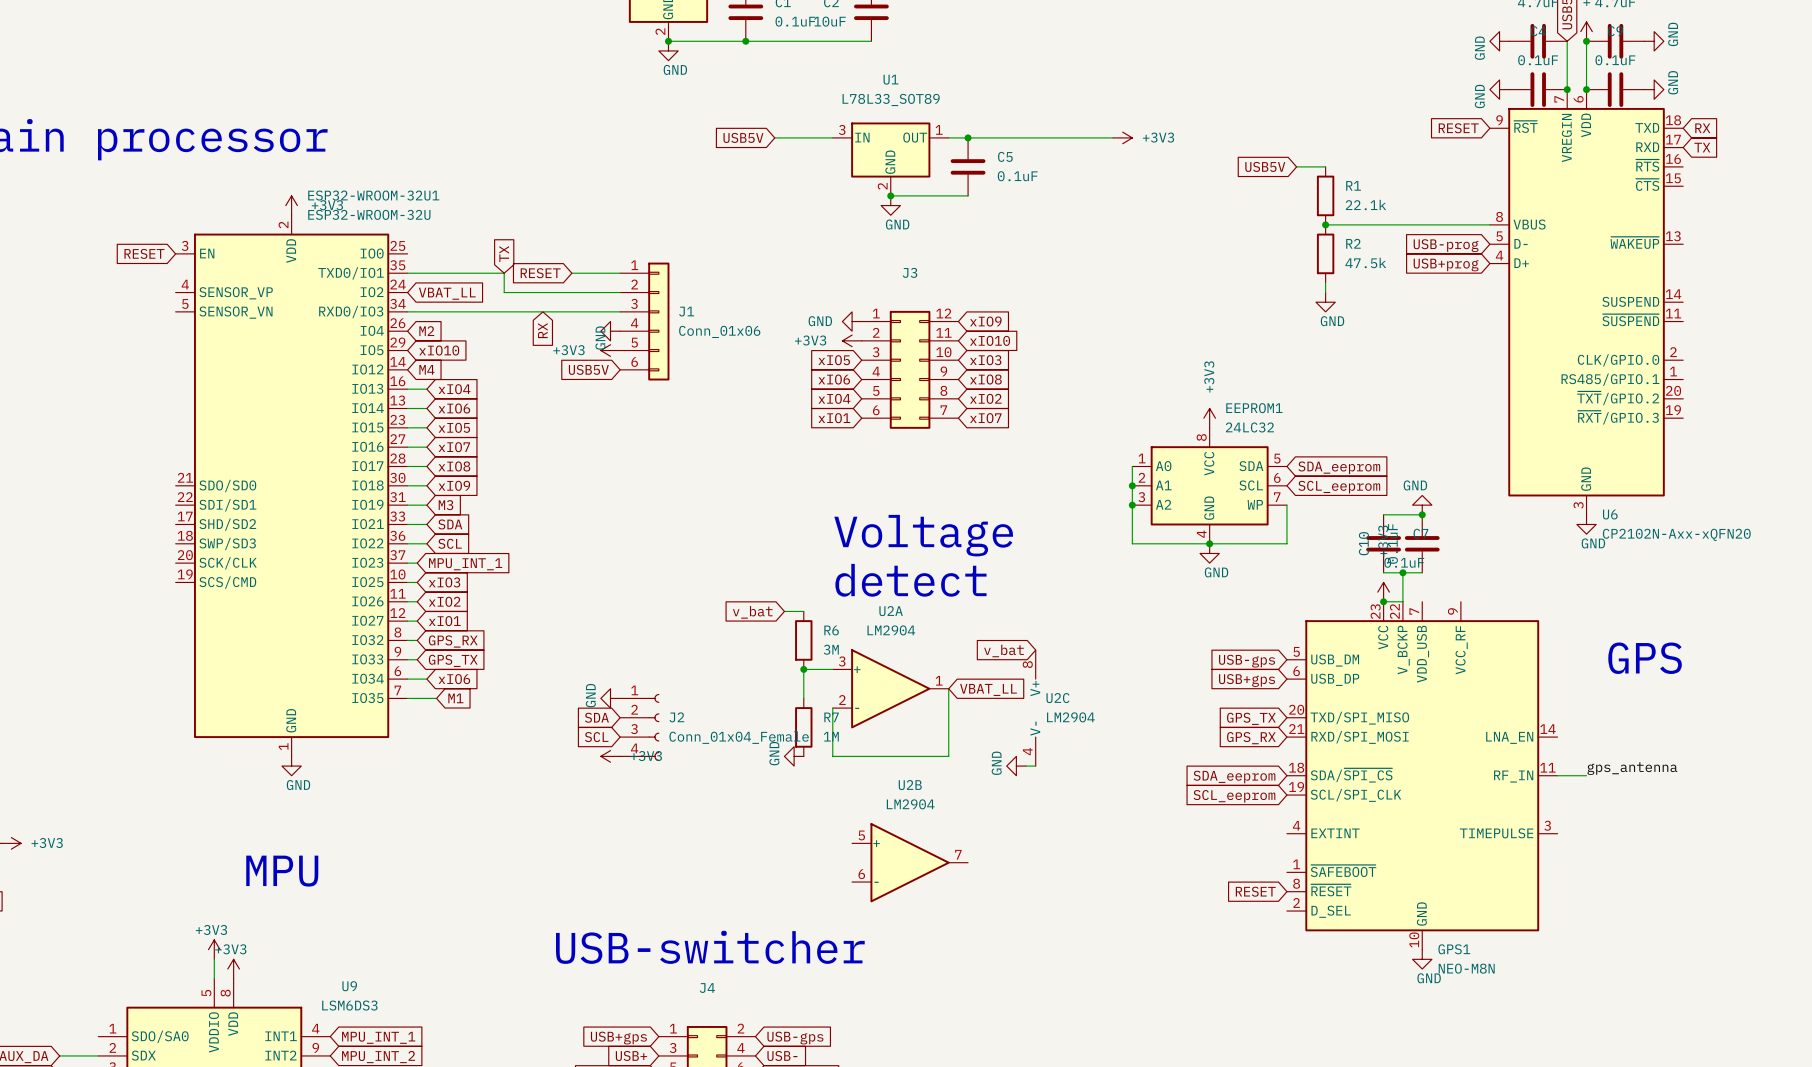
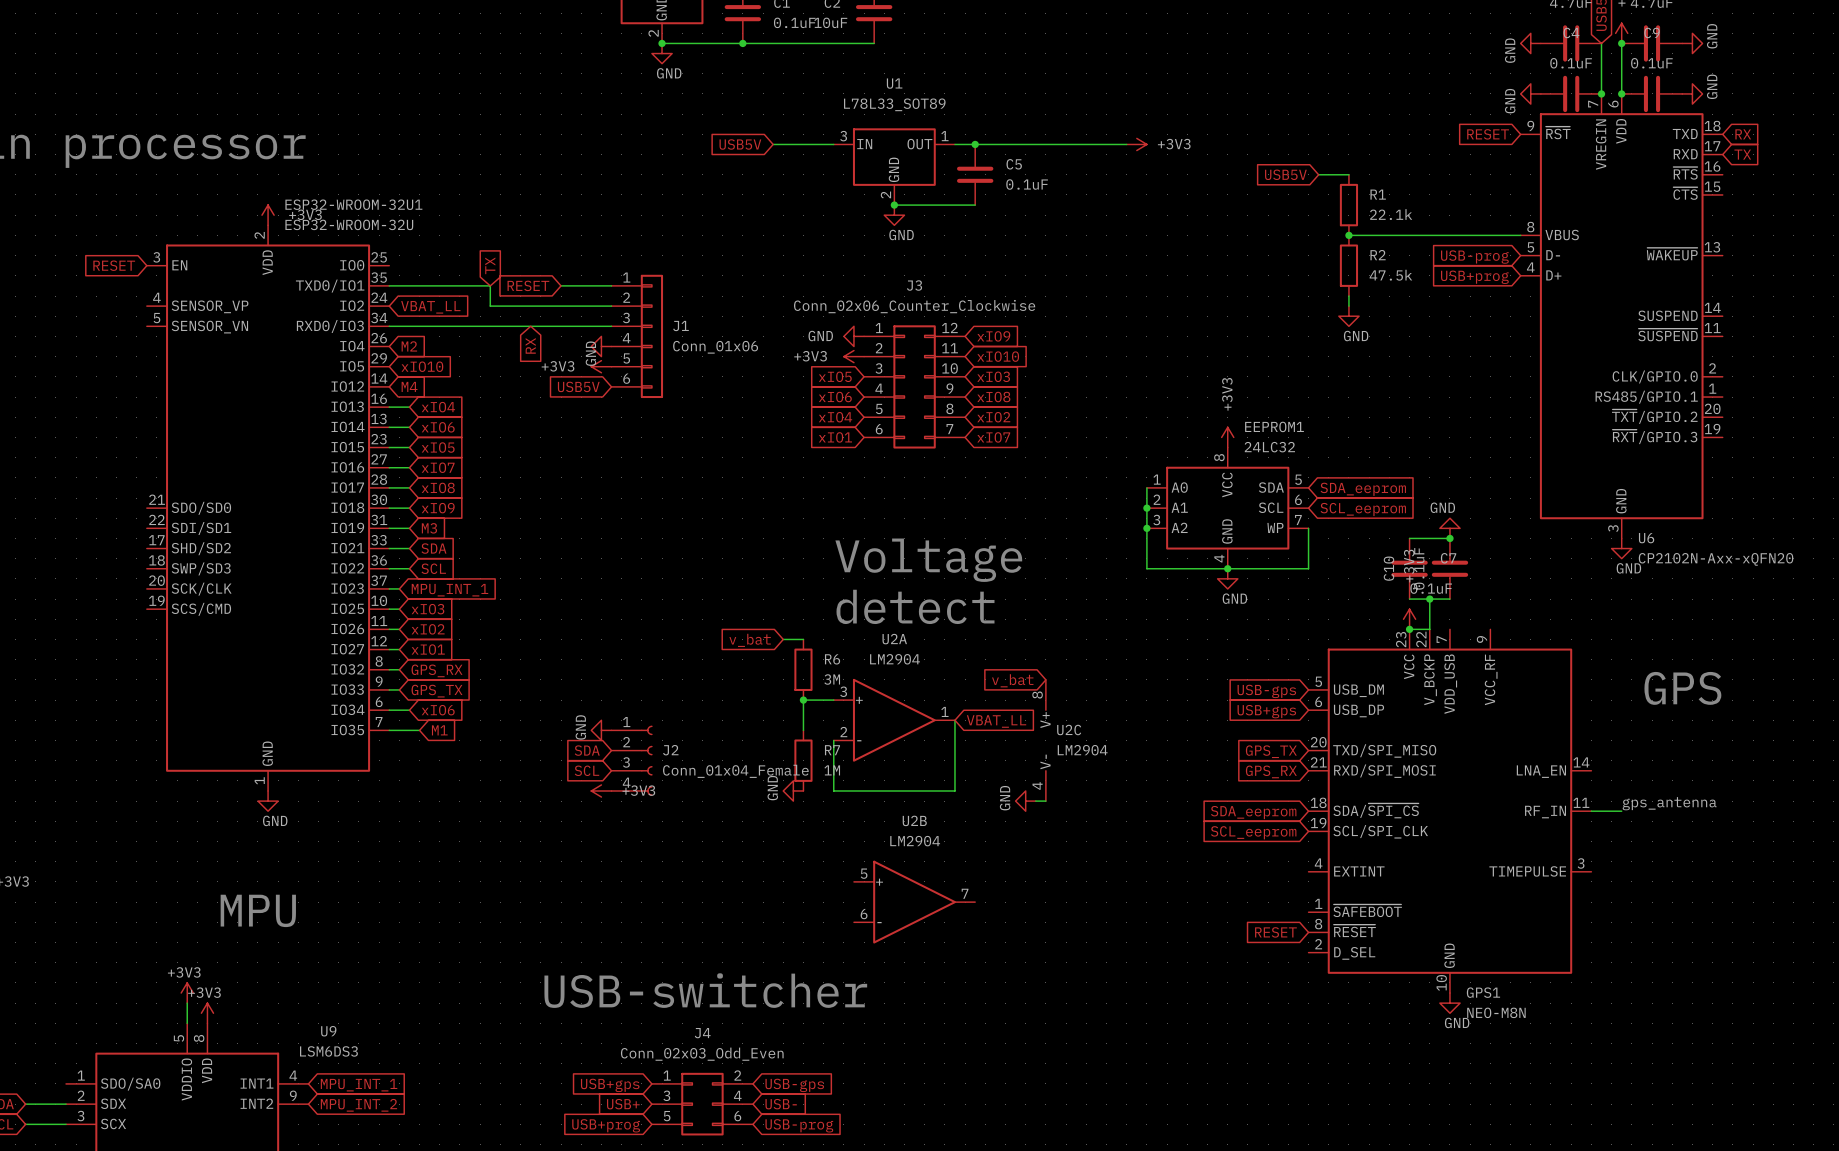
J3 value: none -> Conn_02x06_Counter_Clockwise (914, 306)
J4 value: none -> Conn_02x03_Odd_Even (702, 1054)

